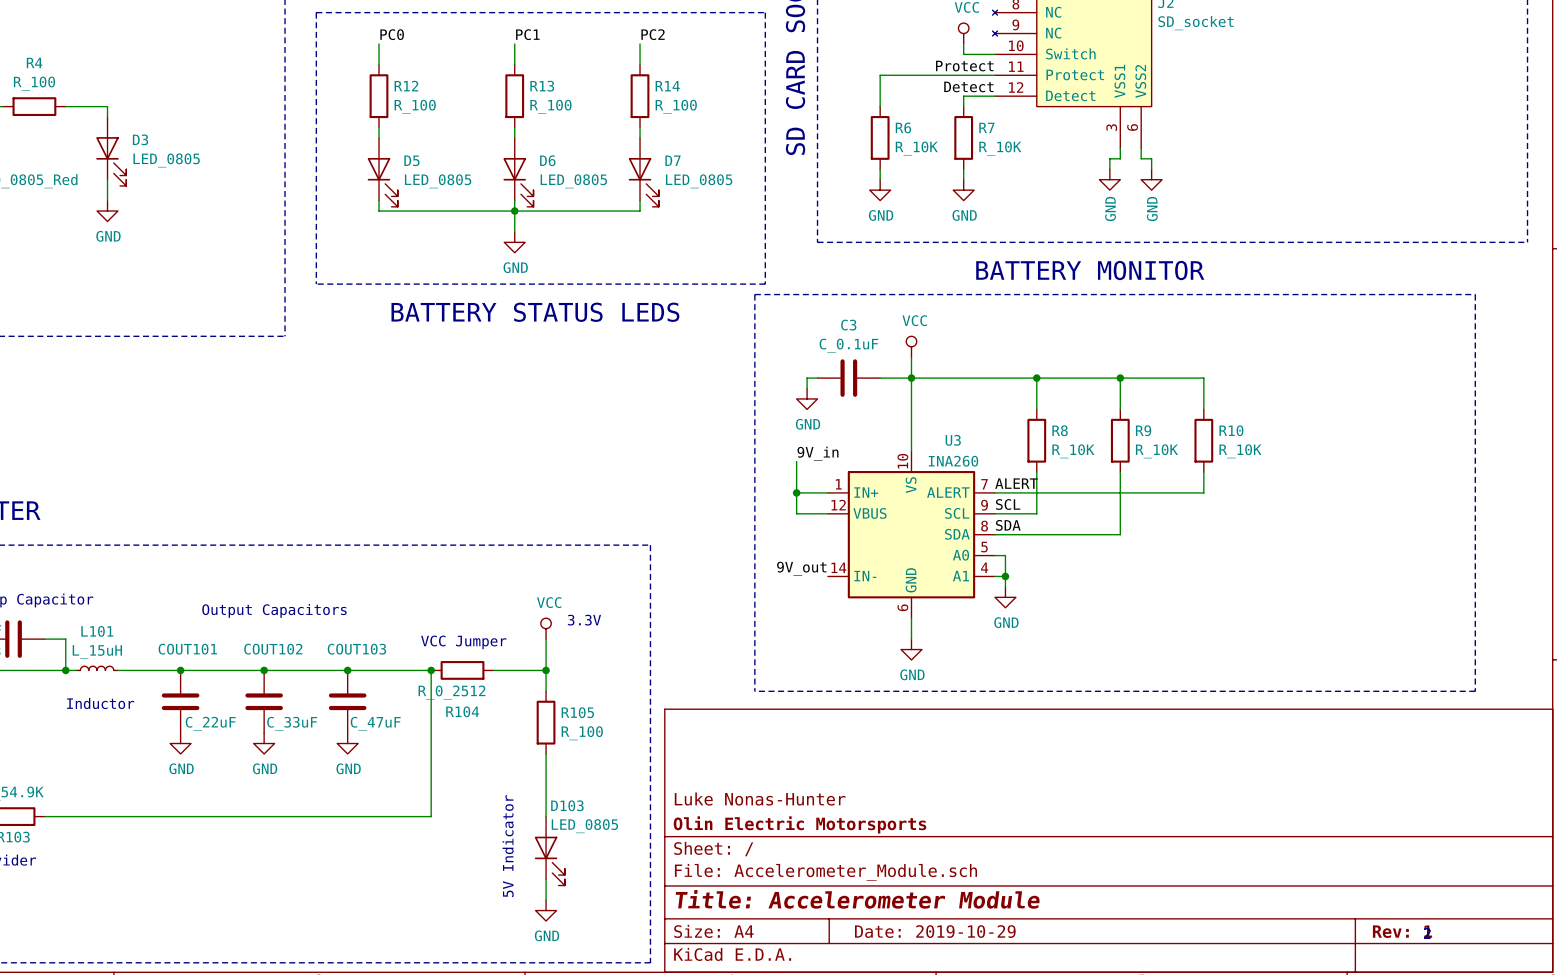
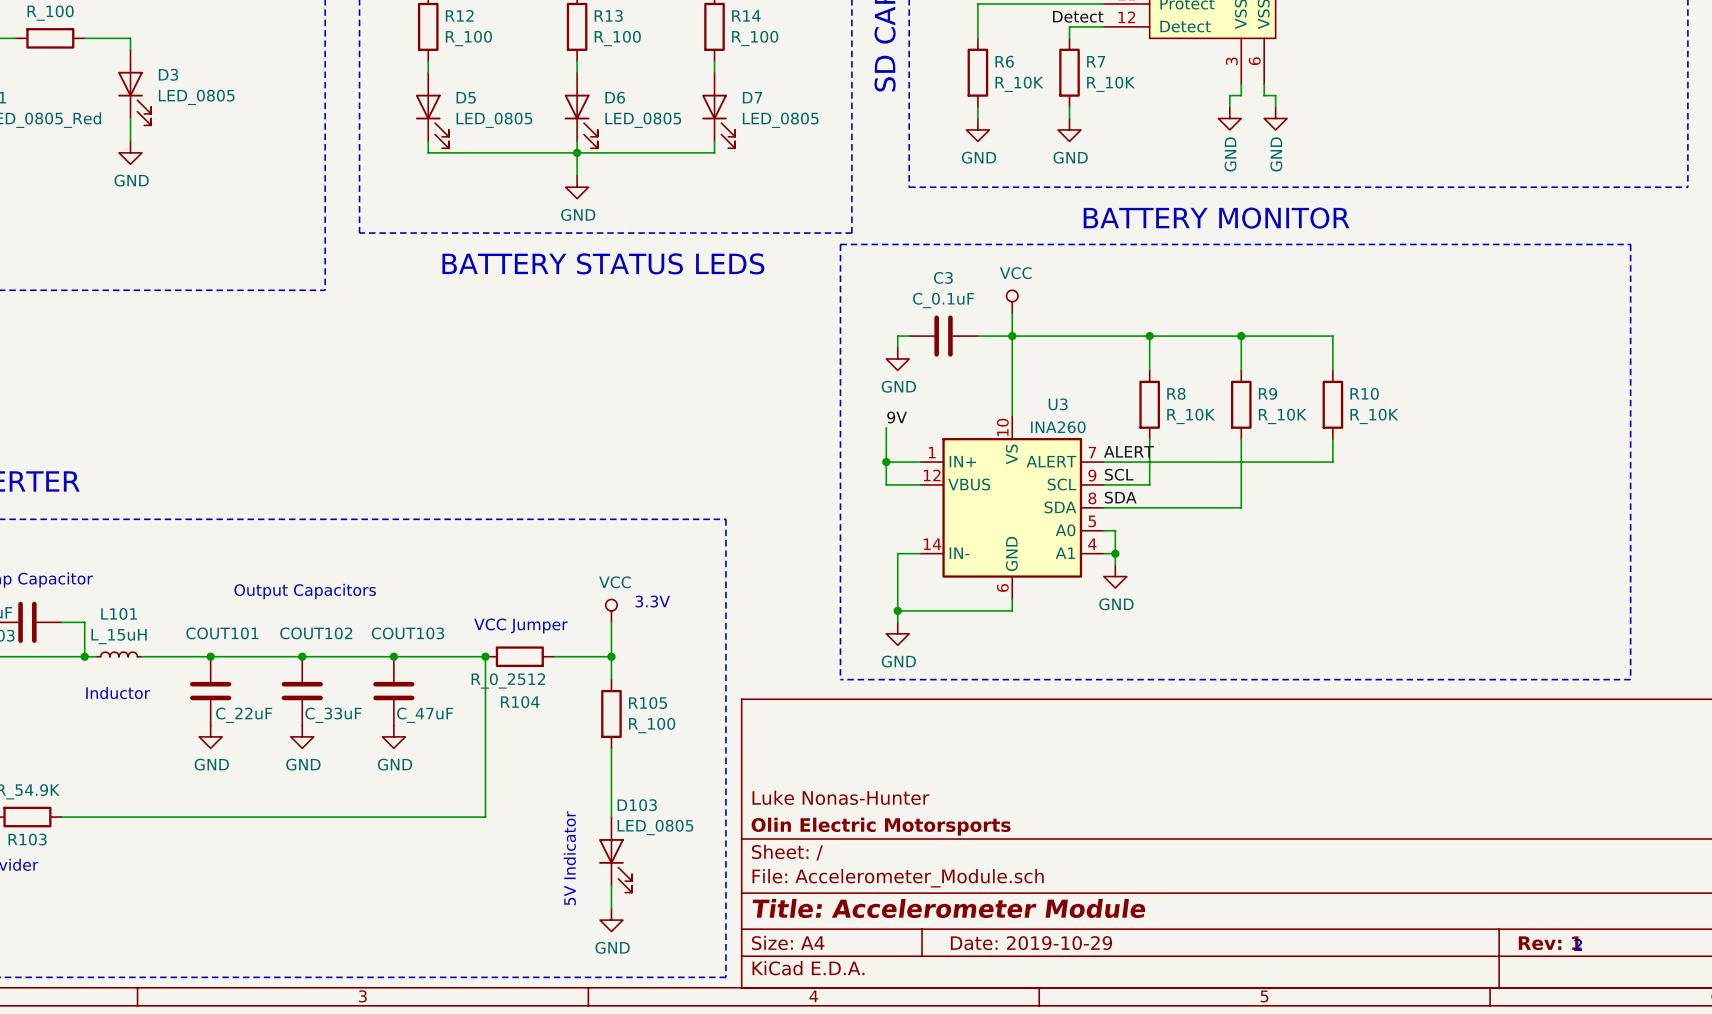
label: 9V_in (817, 453) -> 9V (897, 417)
label: 9V_out (801, 568) -> none
wire: none -> (920, 553) (897, 553) (897, 622)
junction: none -> (897, 610)
wire: (911, 628) (911, 639) -> (1012, 610) (897, 610)
power symbol position: GND (911, 649) -> GND (897, 633)

